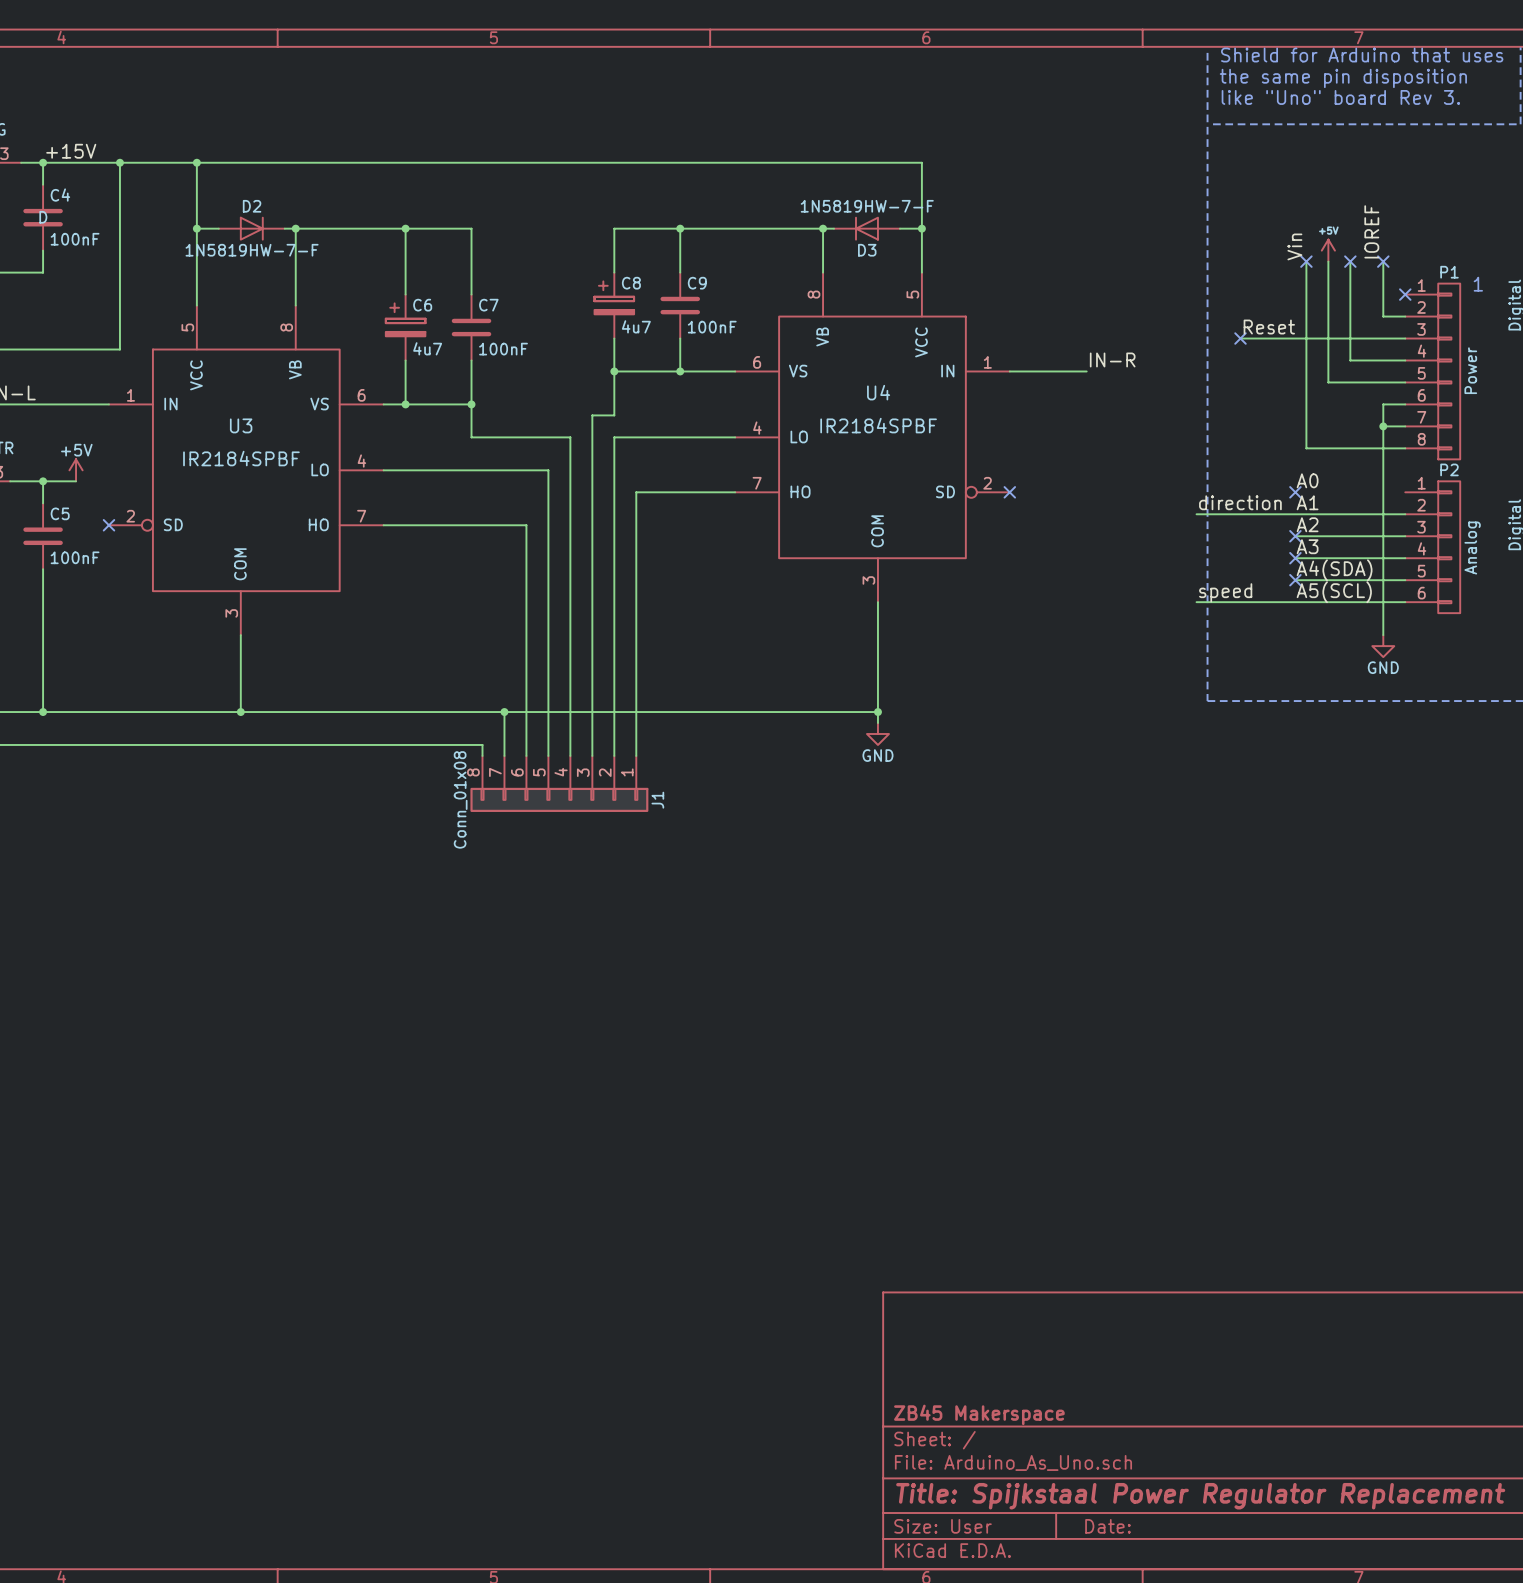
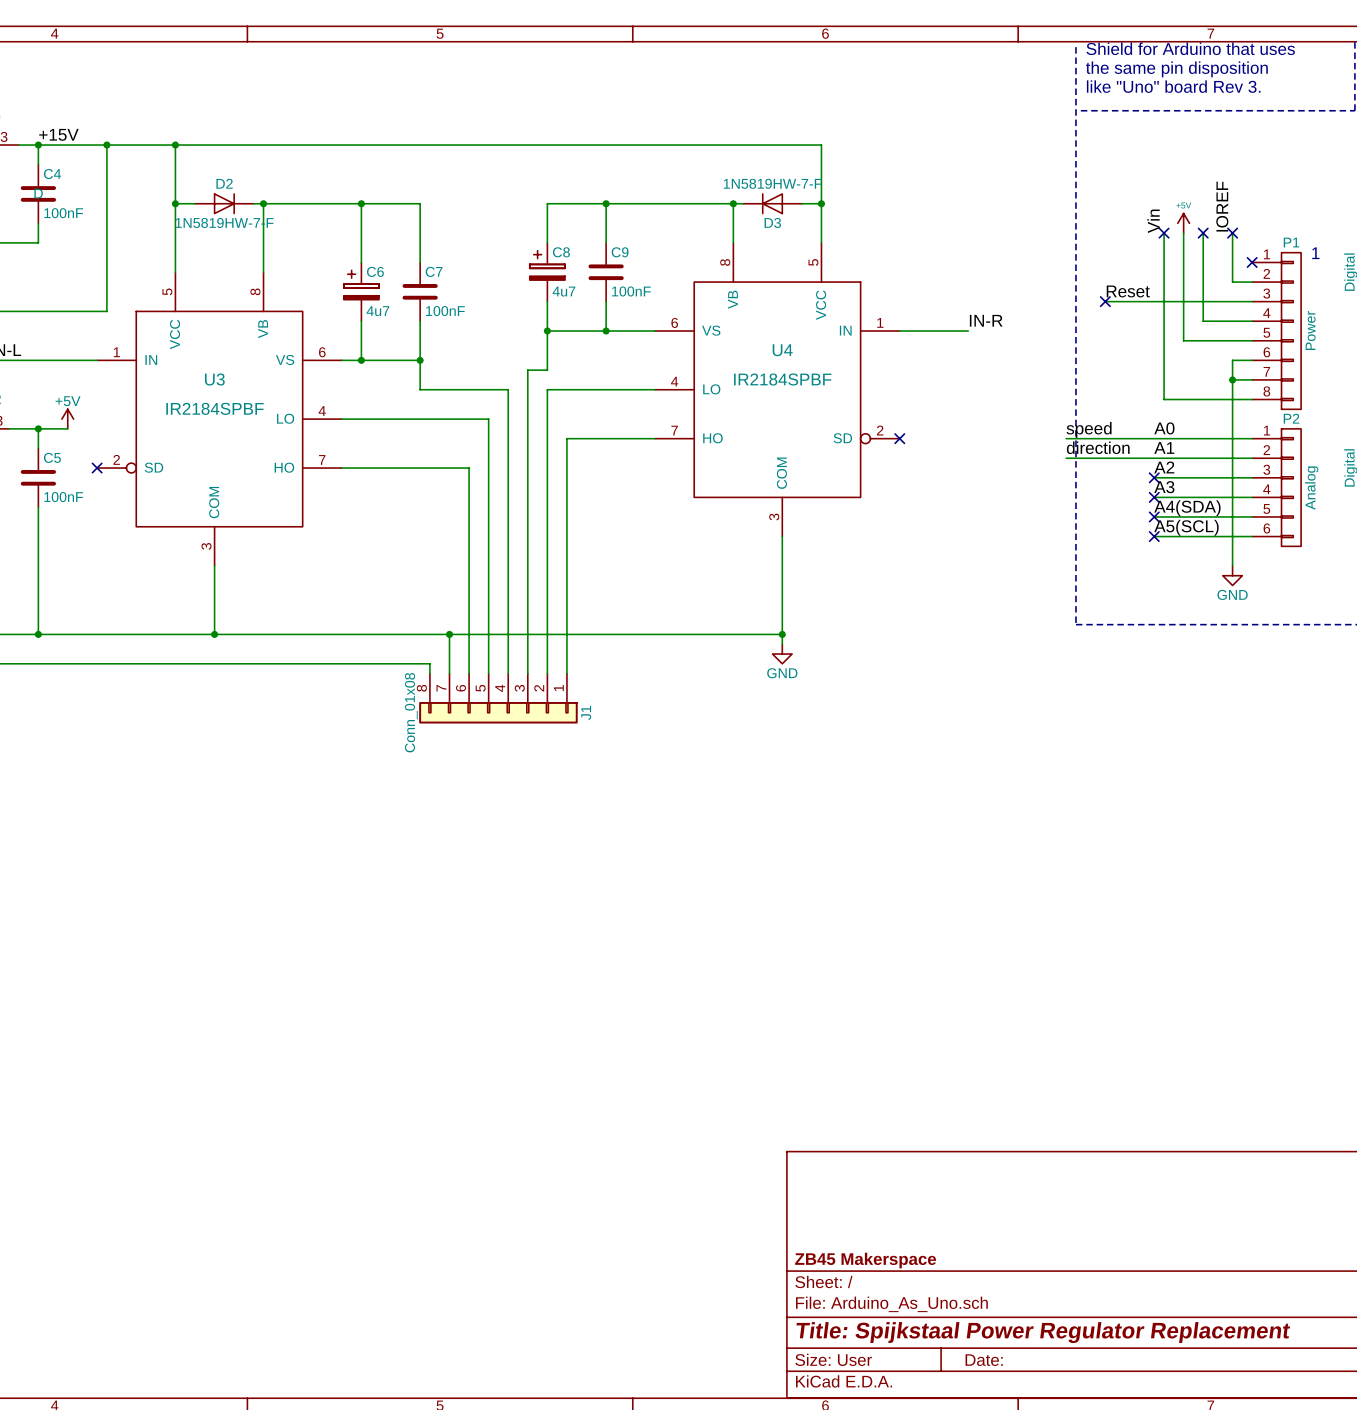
wire: none -> (1066, 438) (1252, 438)
no-connect mark: (1295, 492) -> none
label position: speed (1225, 592) -> speed (1089, 429)
wire: (1196, 602) (1295, 602) -> none
no-connect mark: none -> (1154, 536)

